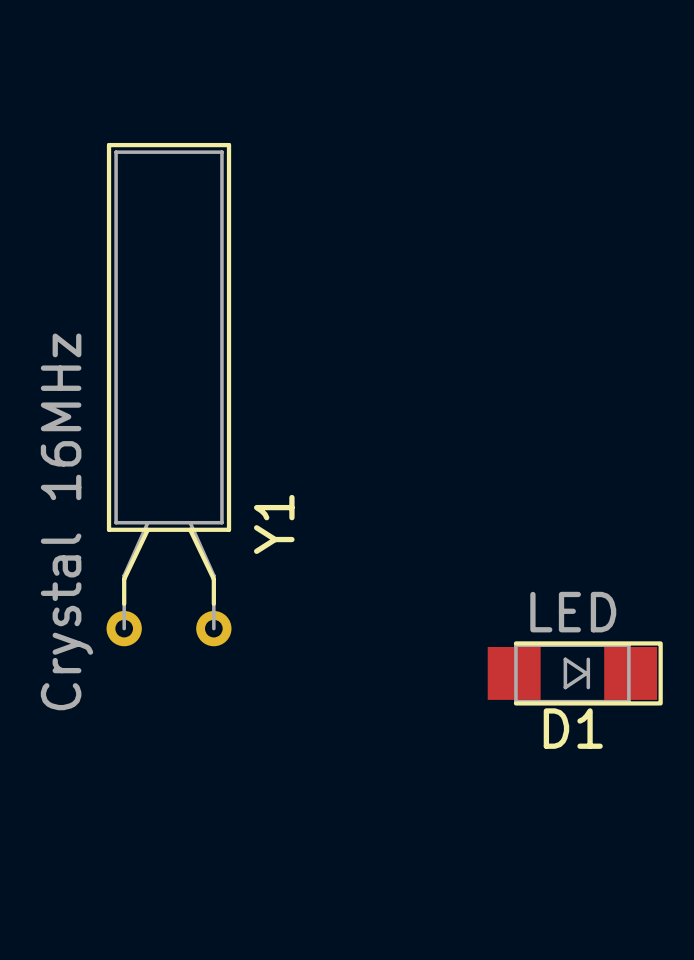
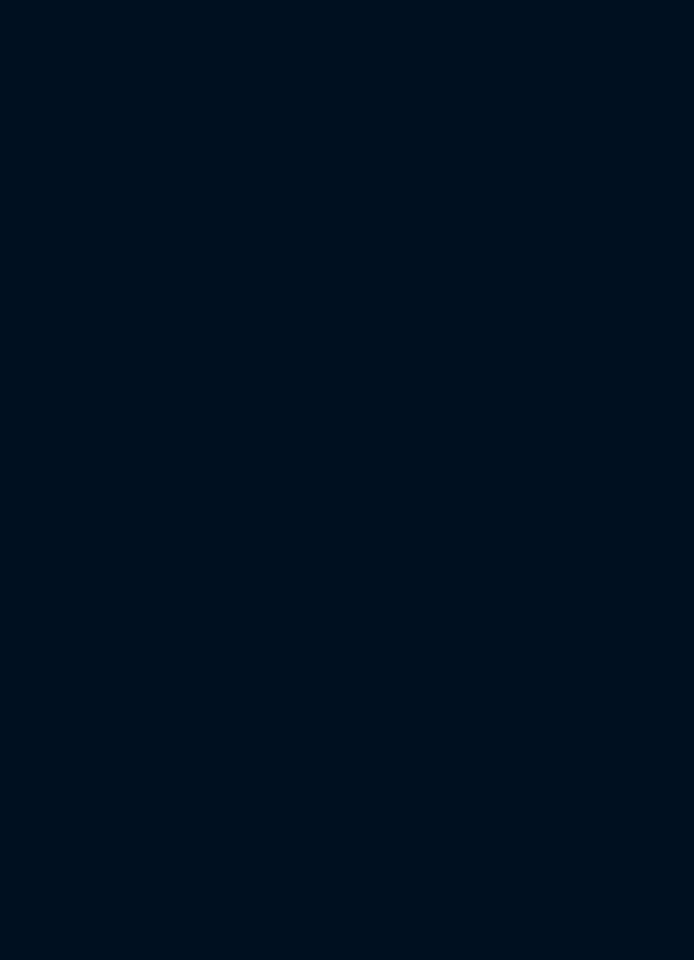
Y1: Crystal 16MHz (169, 394) -> none
D1: LED (575, 673) -> none

